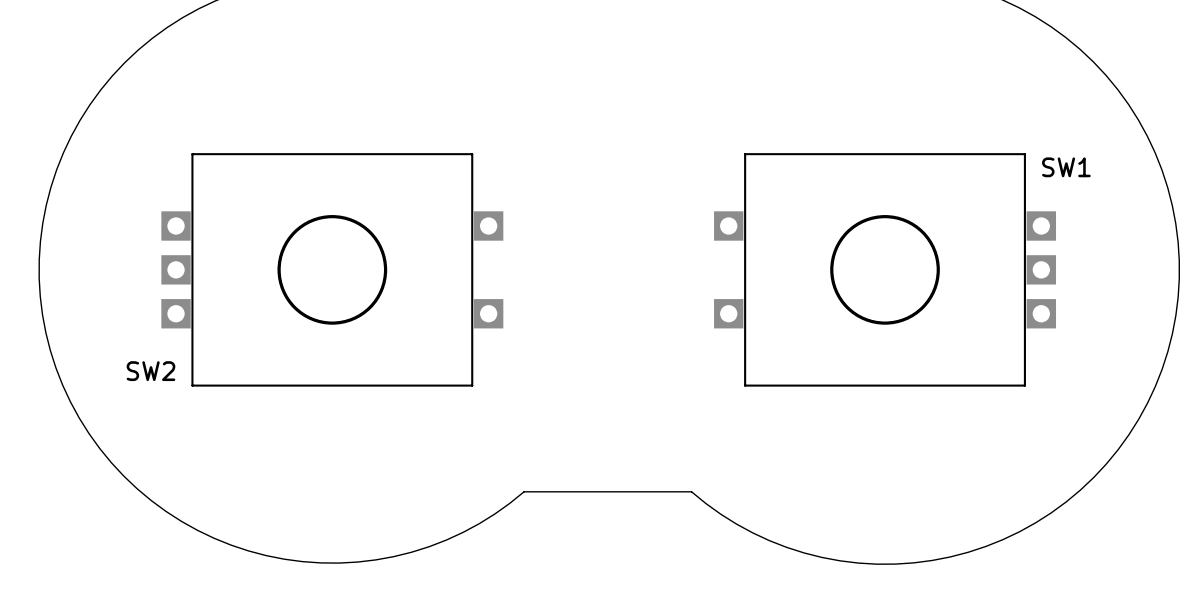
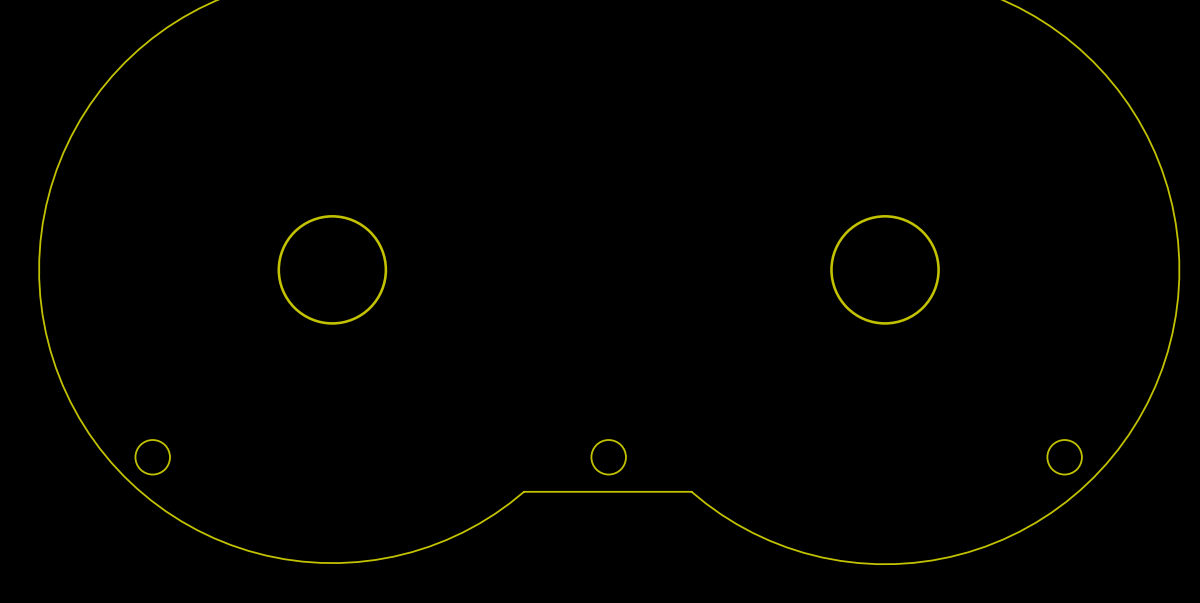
SW2: (332, 269) -> none
SW1: (885, 269) -> none
round board edge: none -> [135, 439, 171, 475]
round board edge: none -> [590, 439, 627, 475]
round board edge: none -> [1046, 439, 1083, 475]

